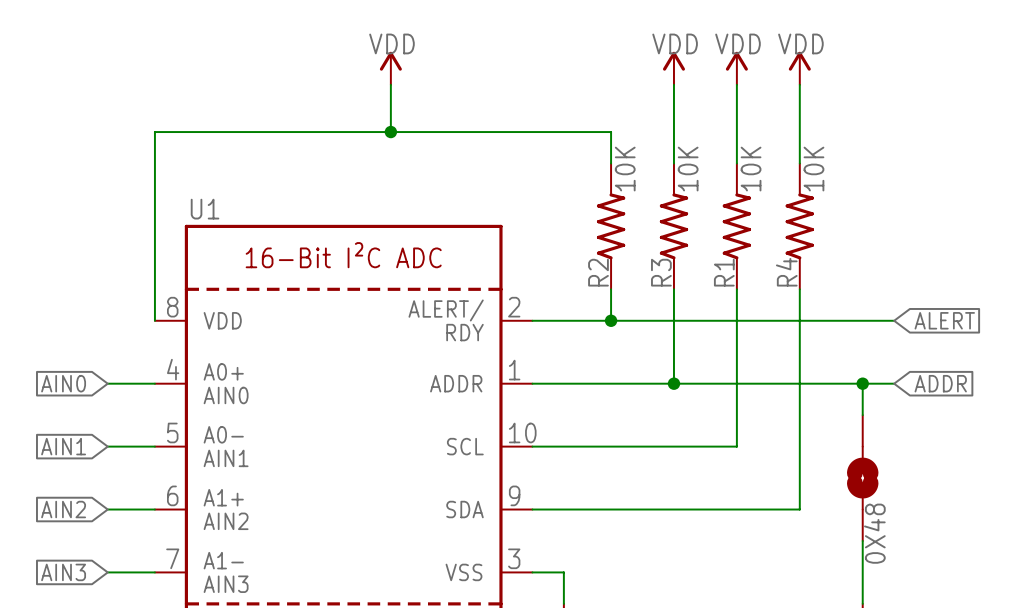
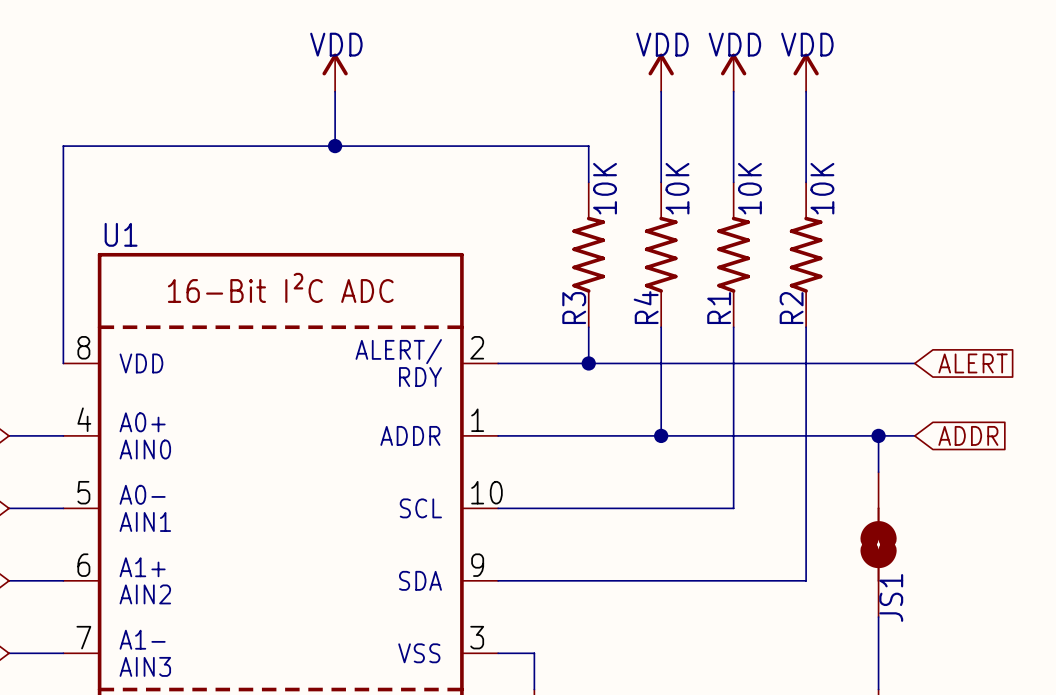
R2 name: R2 (598, 272) -> R3 (574, 308)
R3 name: R3 (661, 272) -> R4 (646, 307)
R4 name: R4 (786, 272) -> R2 (791, 308)
0X48 name: 0X48 (874, 533) -> JS1 (891, 597)

